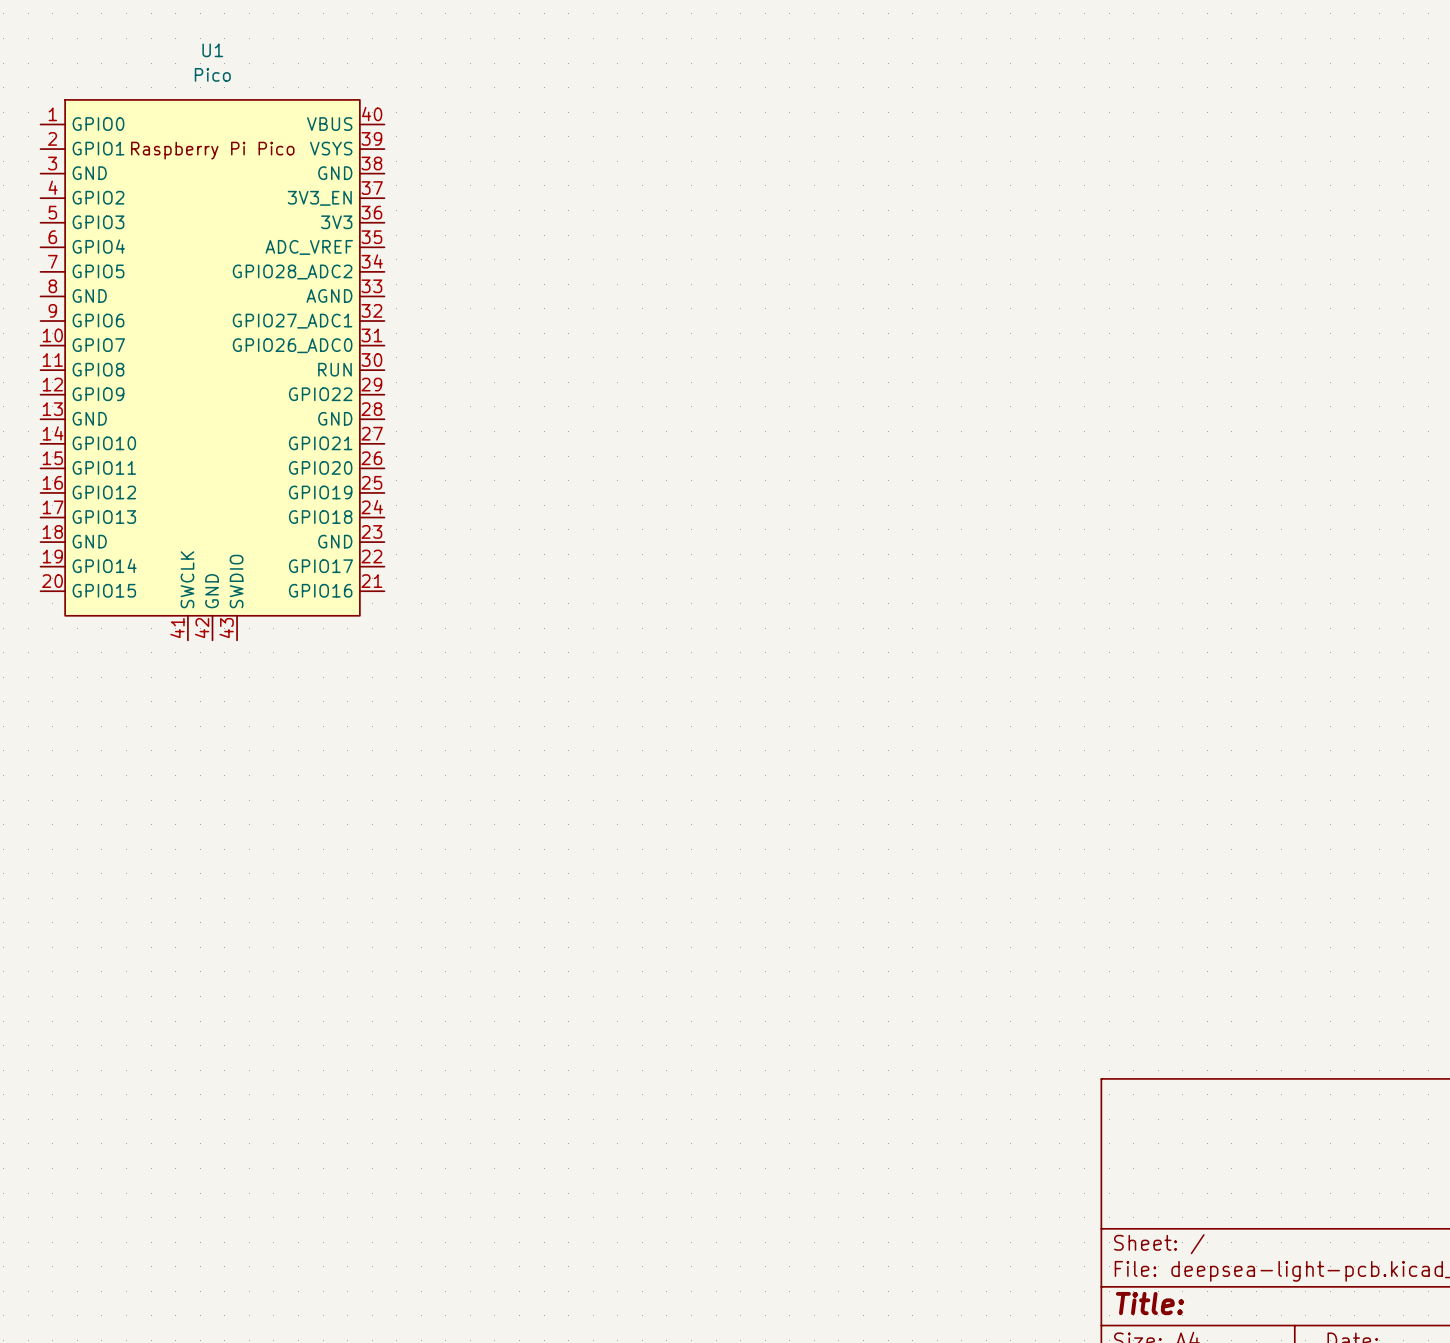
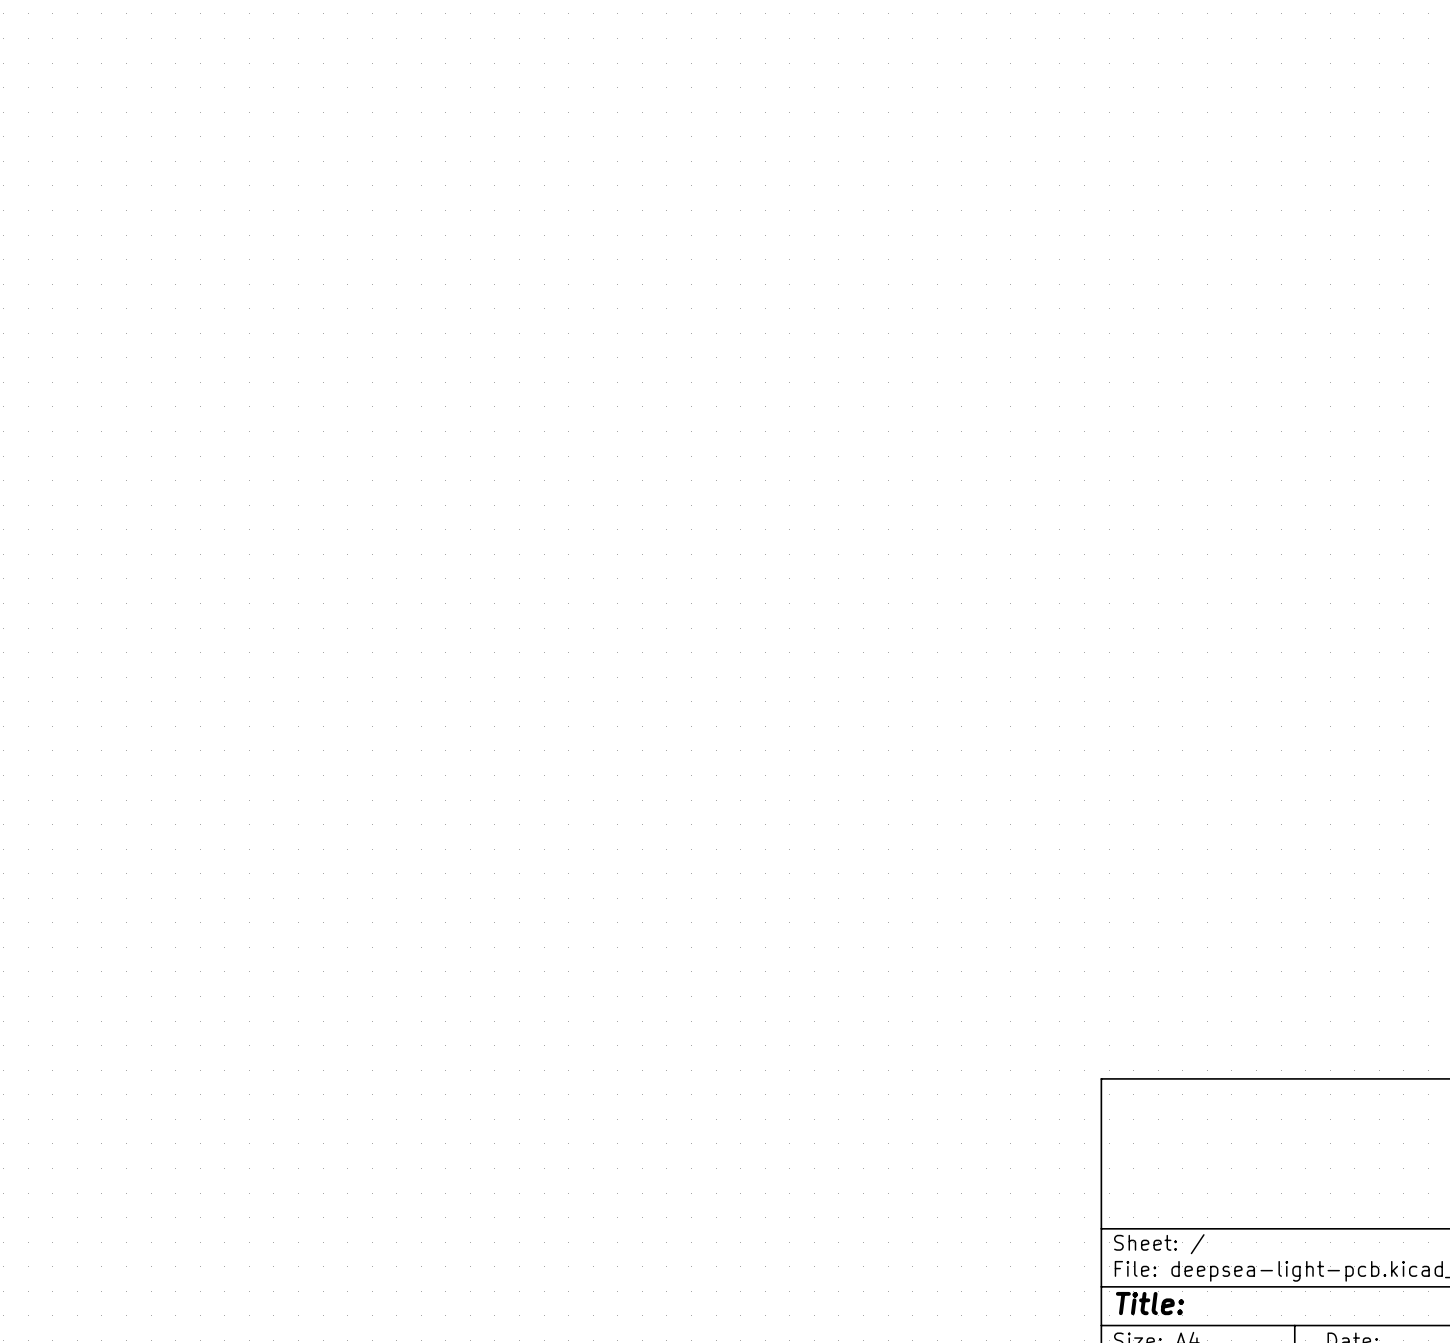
U1: Pico (212, 370) -> none

